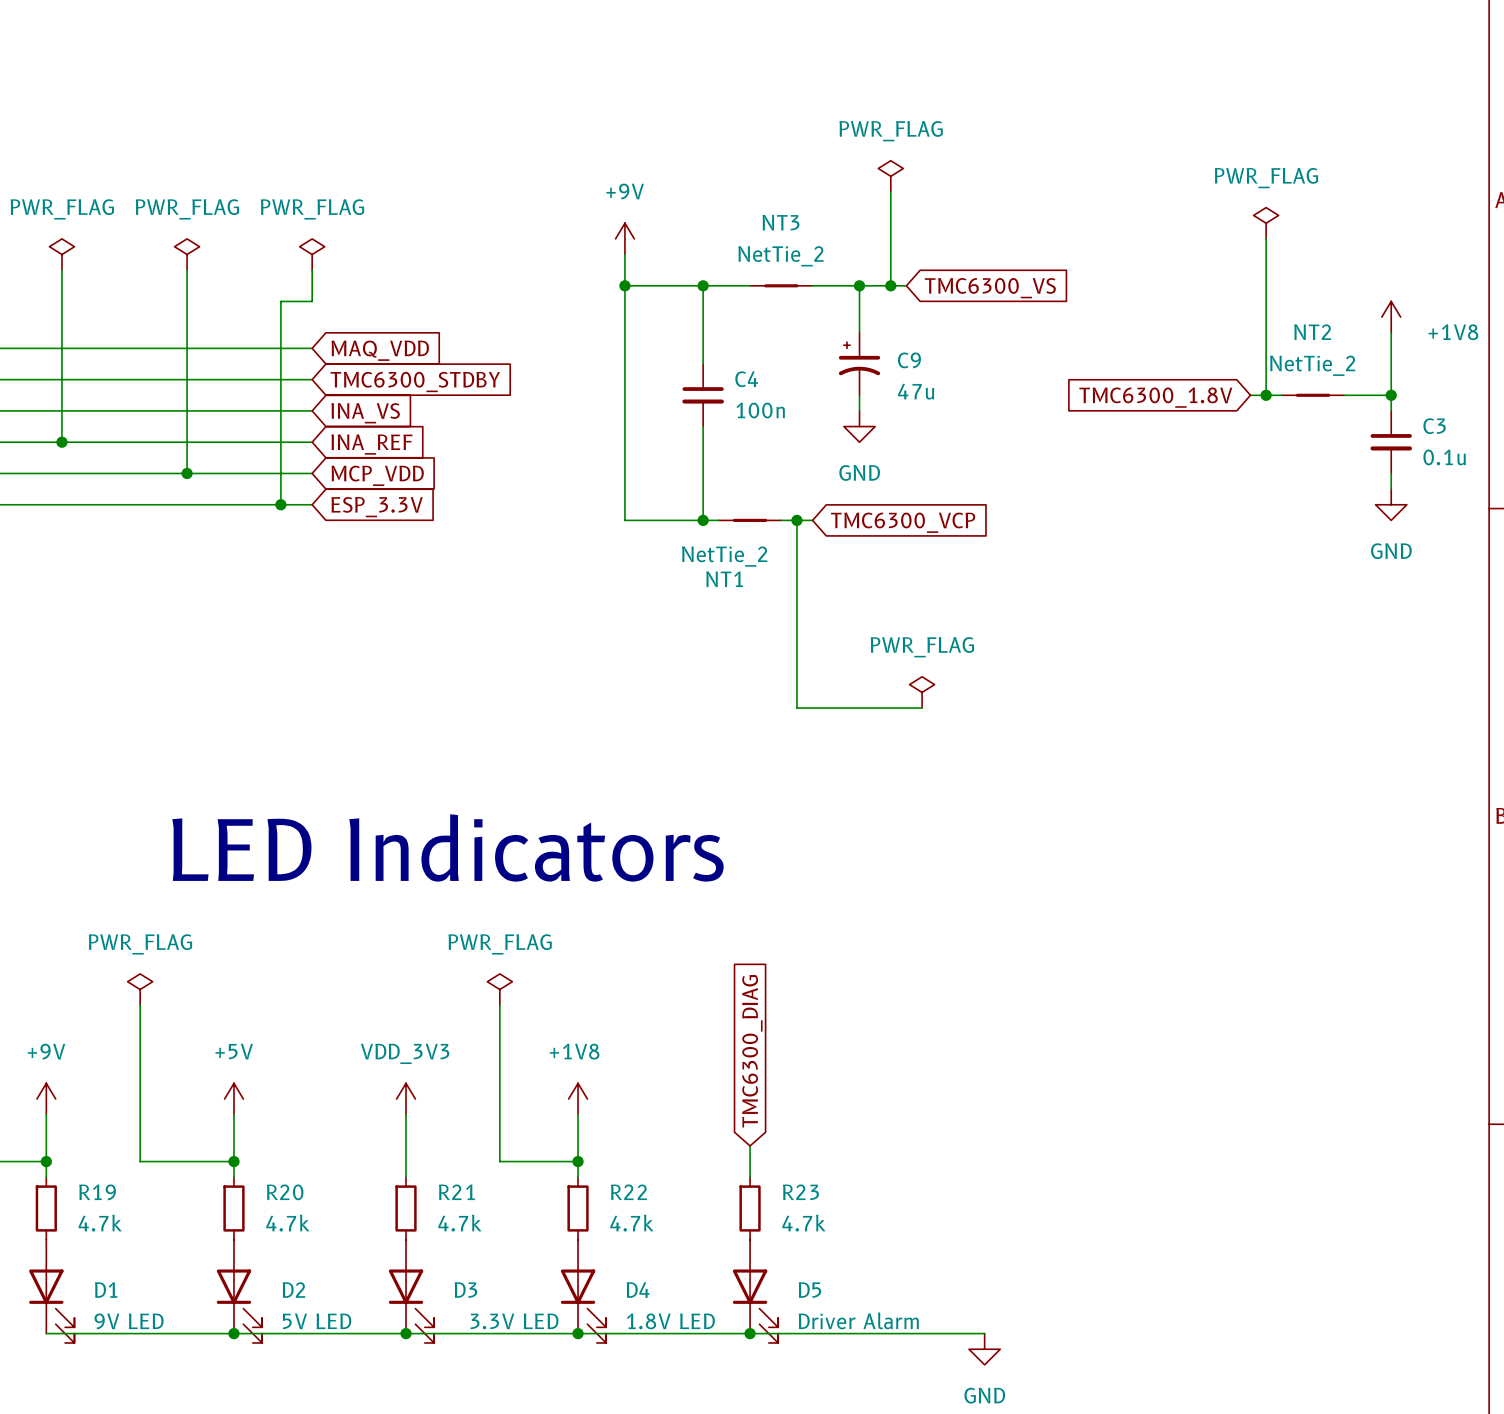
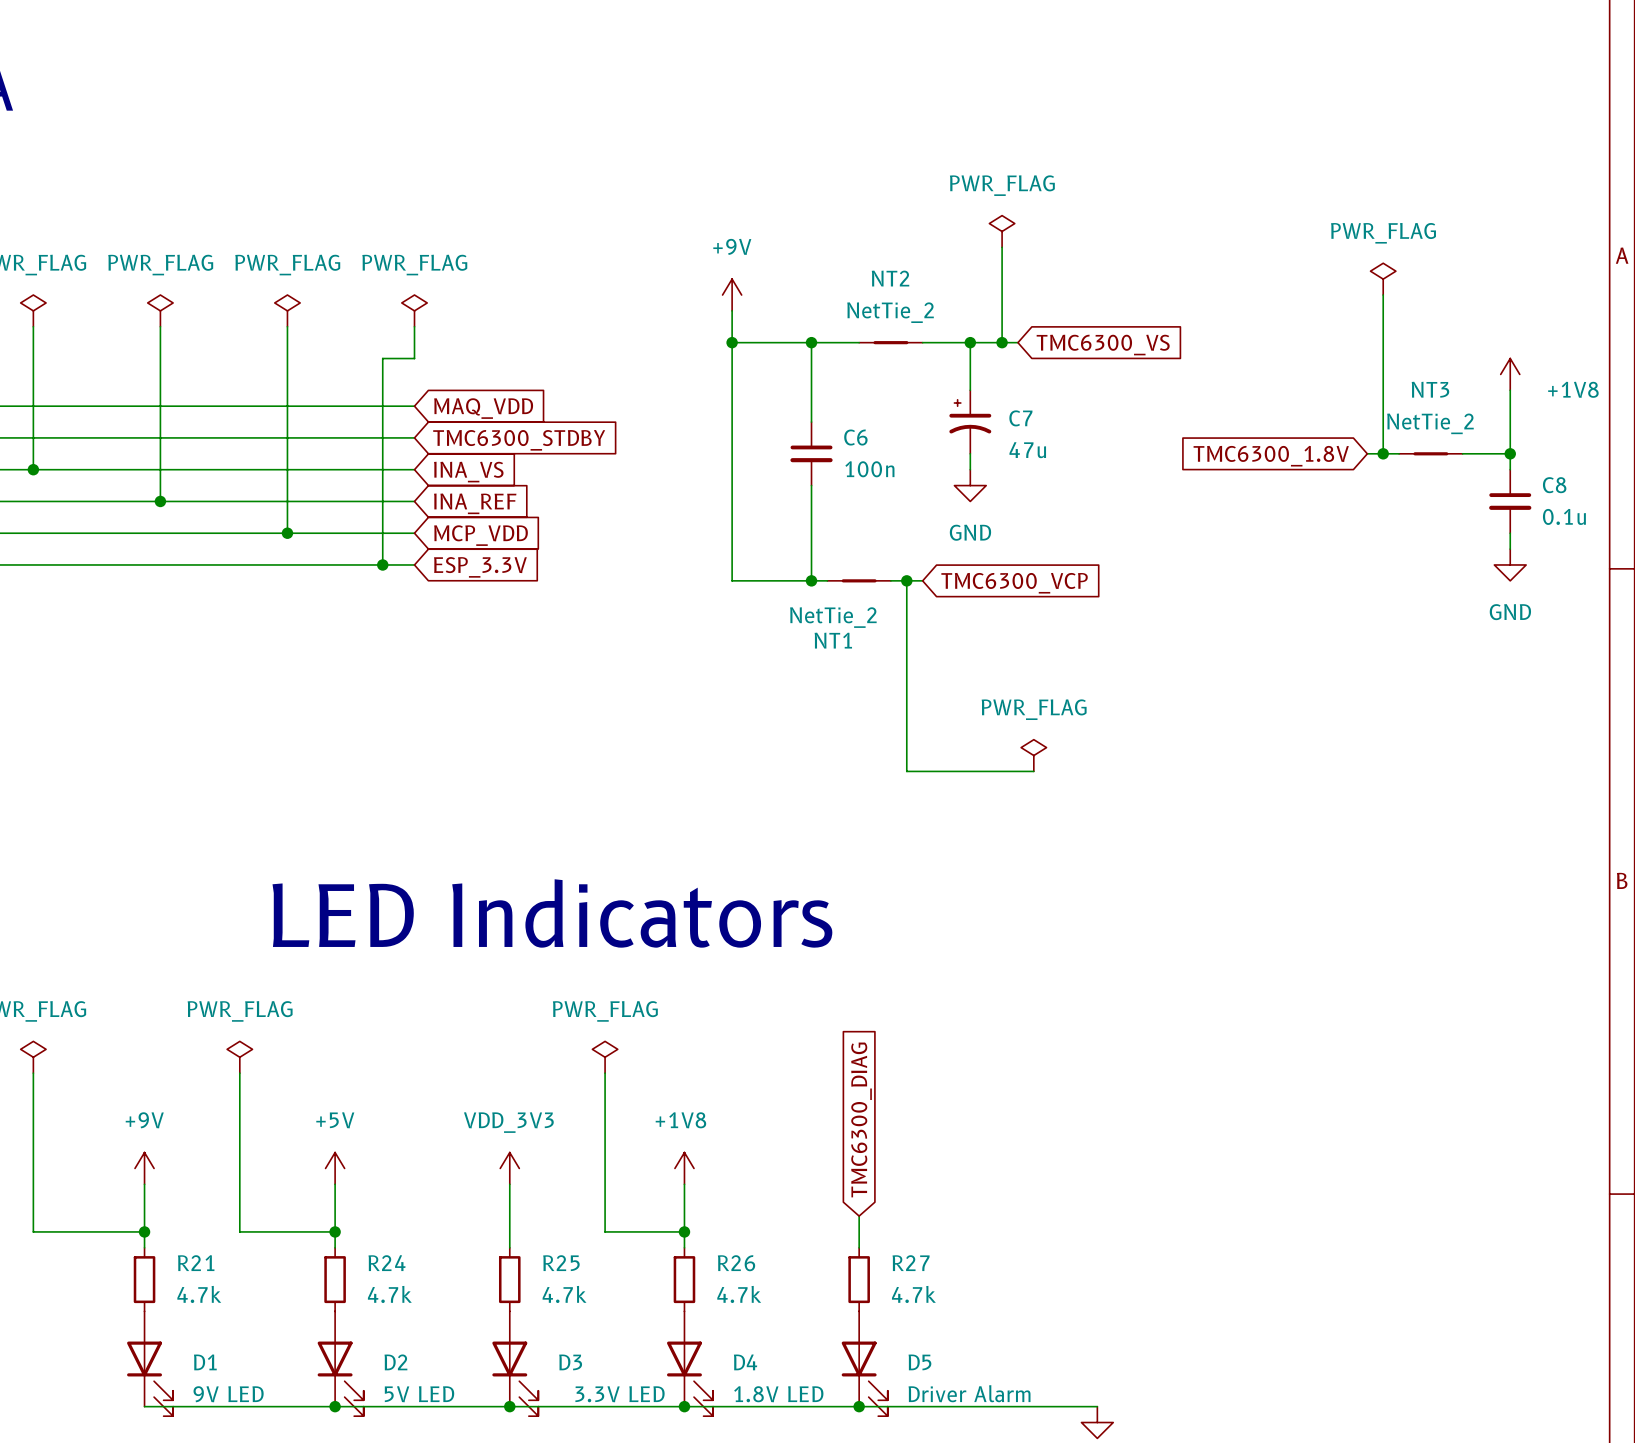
NT3 name: NT3 (780, 222) -> NT2 (890, 278)
NT2 name: NT2 (1312, 332) -> NT3 (1430, 389)
C9 name: C9 (909, 360) -> C7 (1020, 418)
C4 name: C4 (746, 379) -> C6 (855, 437)
C3 name: C3 (1434, 426) -> C8 (1554, 485)
R19 name: R19 (97, 1192) -> R21 (196, 1263)
R20 name: R20 (285, 1192) -> R24 (387, 1263)
R21 name: R21 (456, 1192) -> R25 (561, 1263)
R22 name: R22 (628, 1192) -> R26 (736, 1263)
R23 name: R23 (800, 1192) -> R27 (911, 1263)

